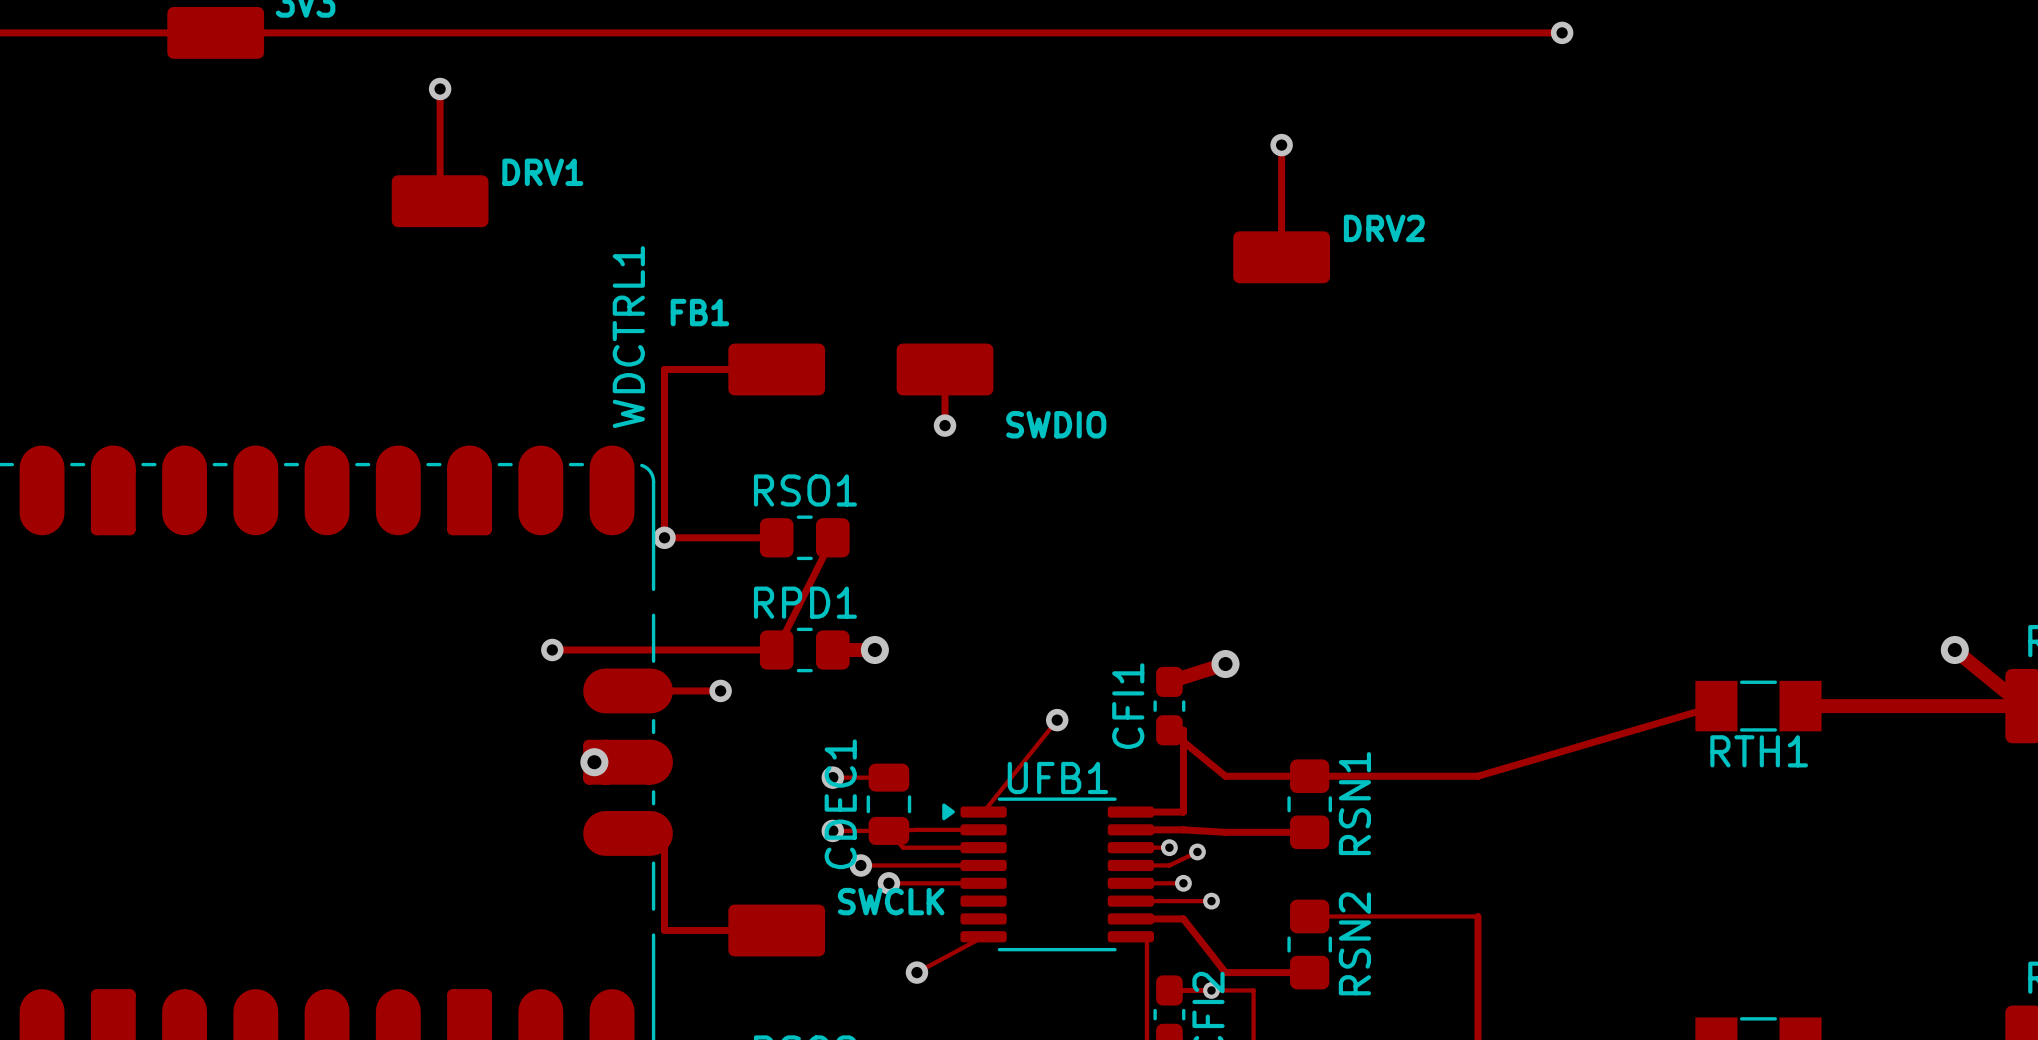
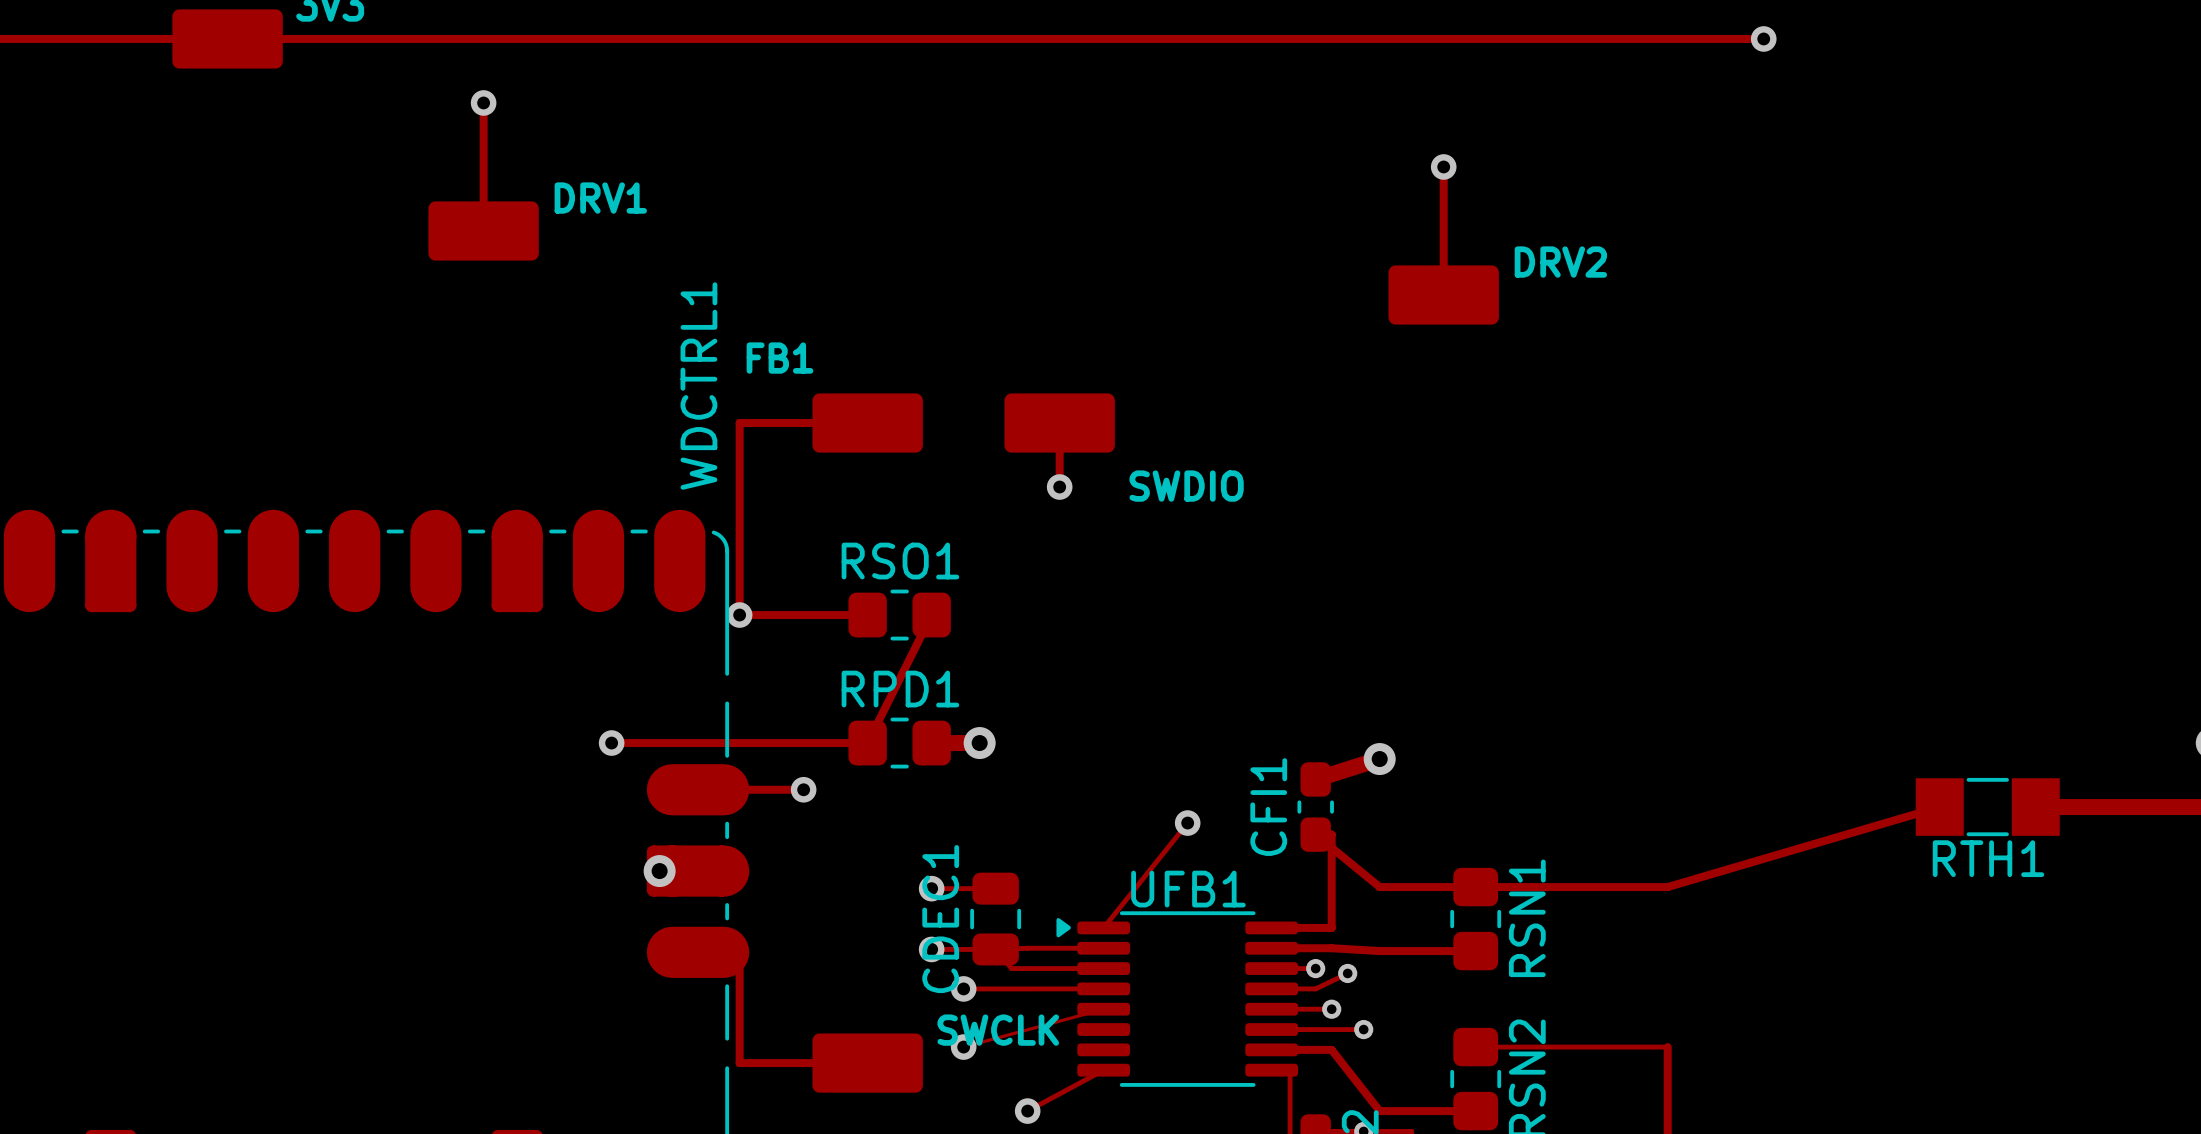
track: (888, 883) (983, 883) -> (963, 1047) (1103, 1009)
via position: (888, 883) -> (963, 1047)

